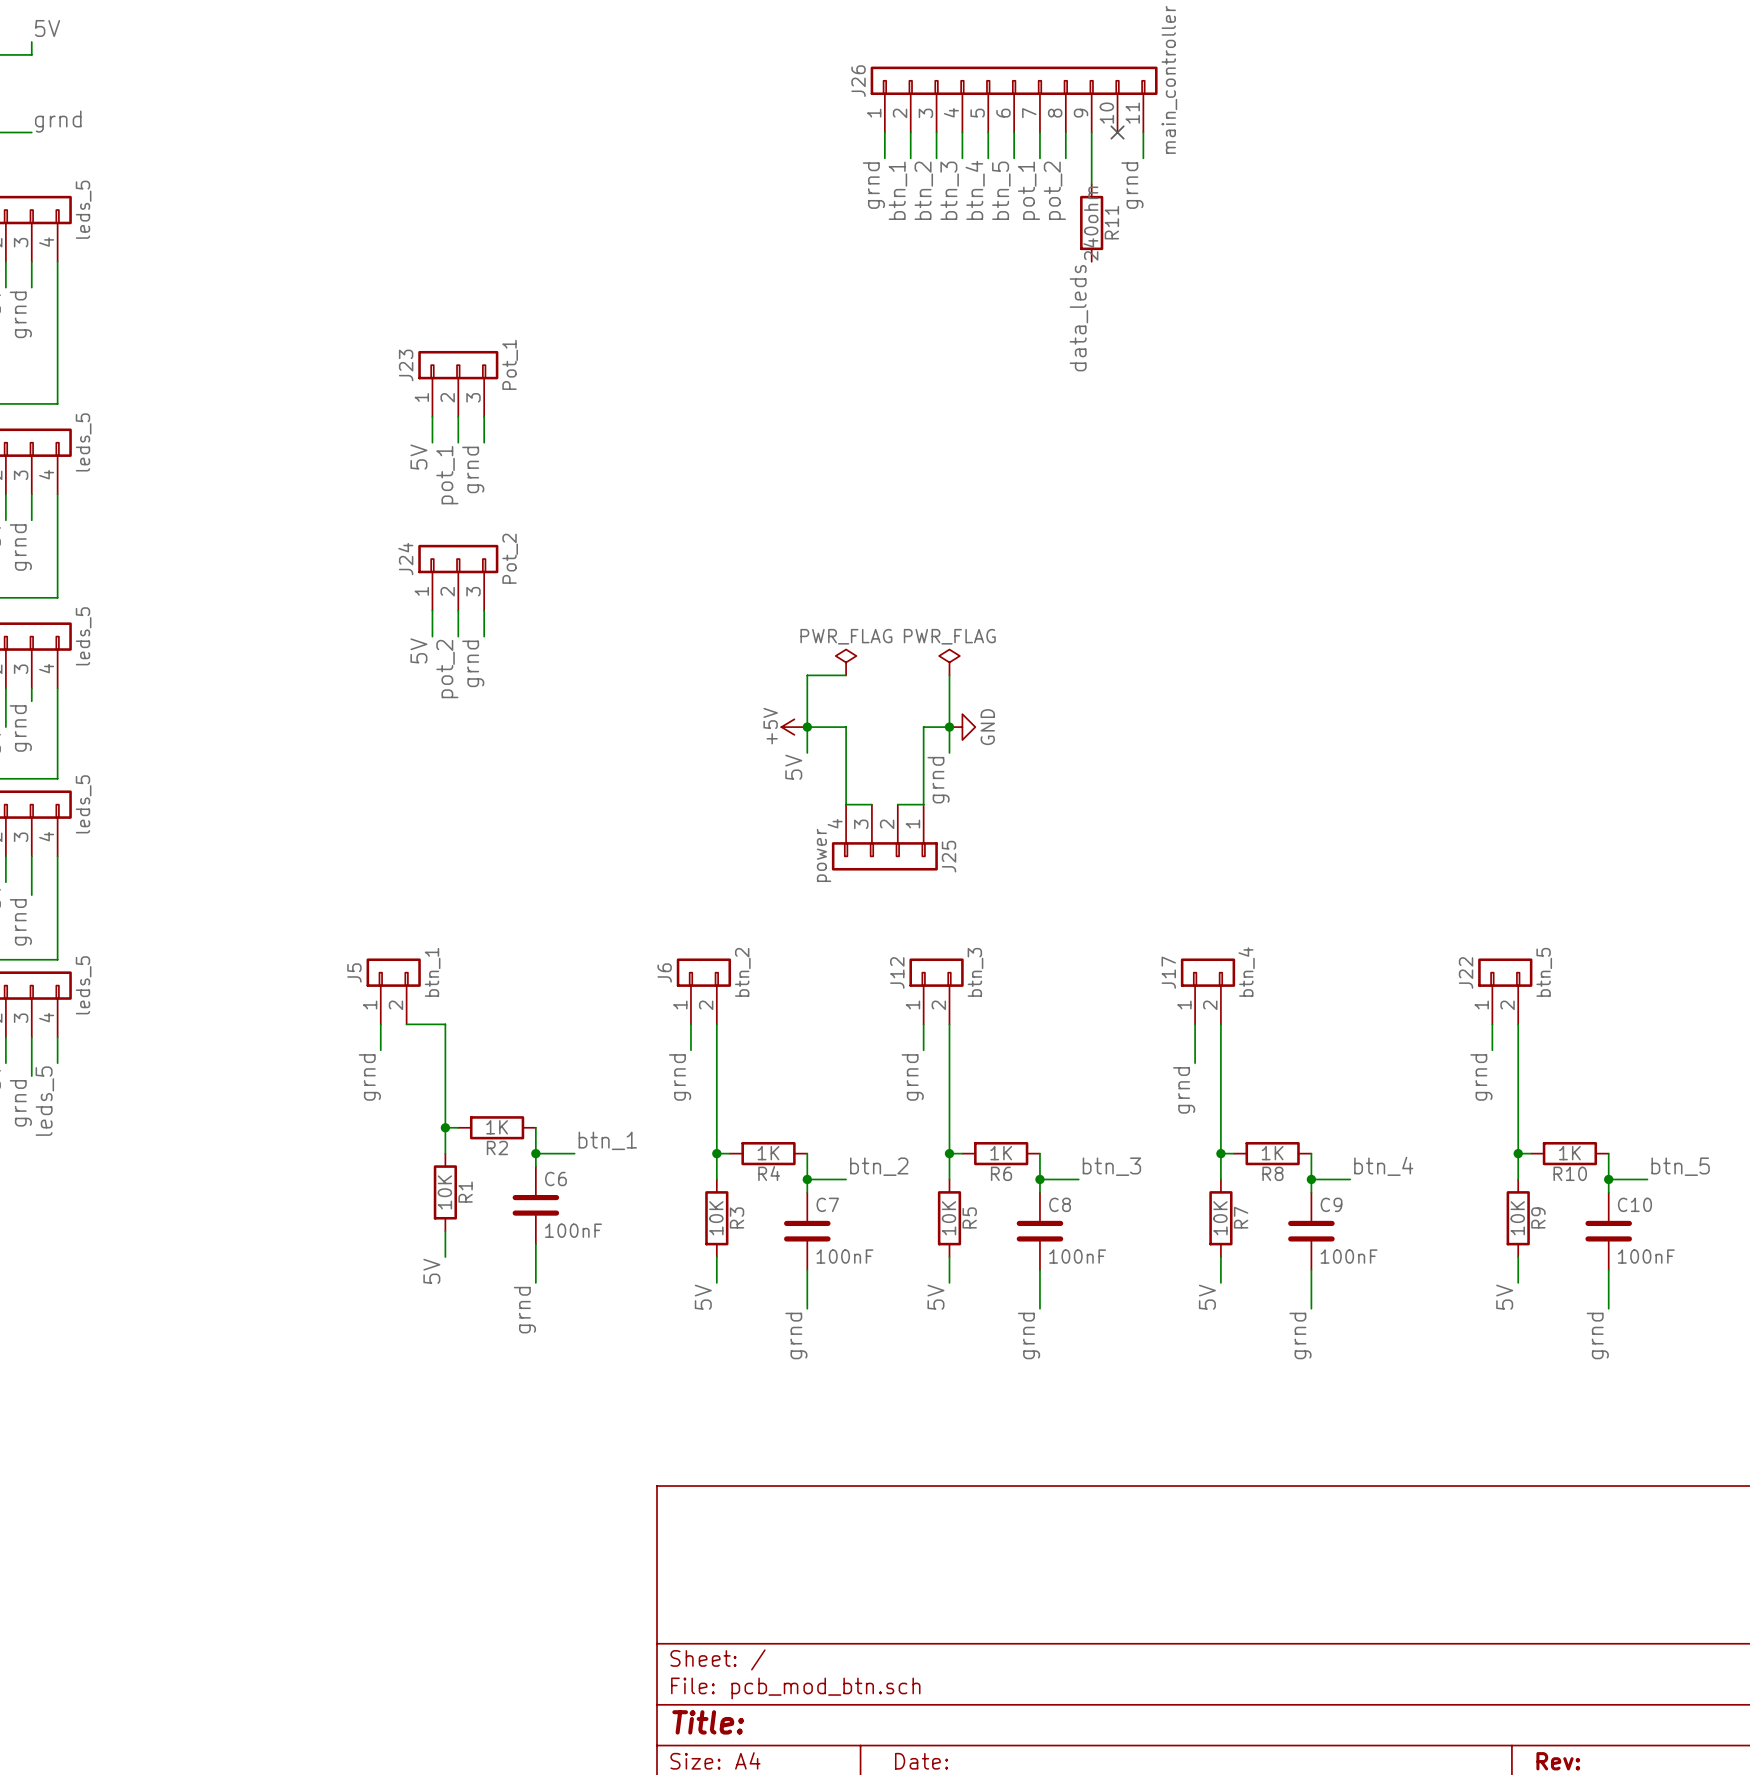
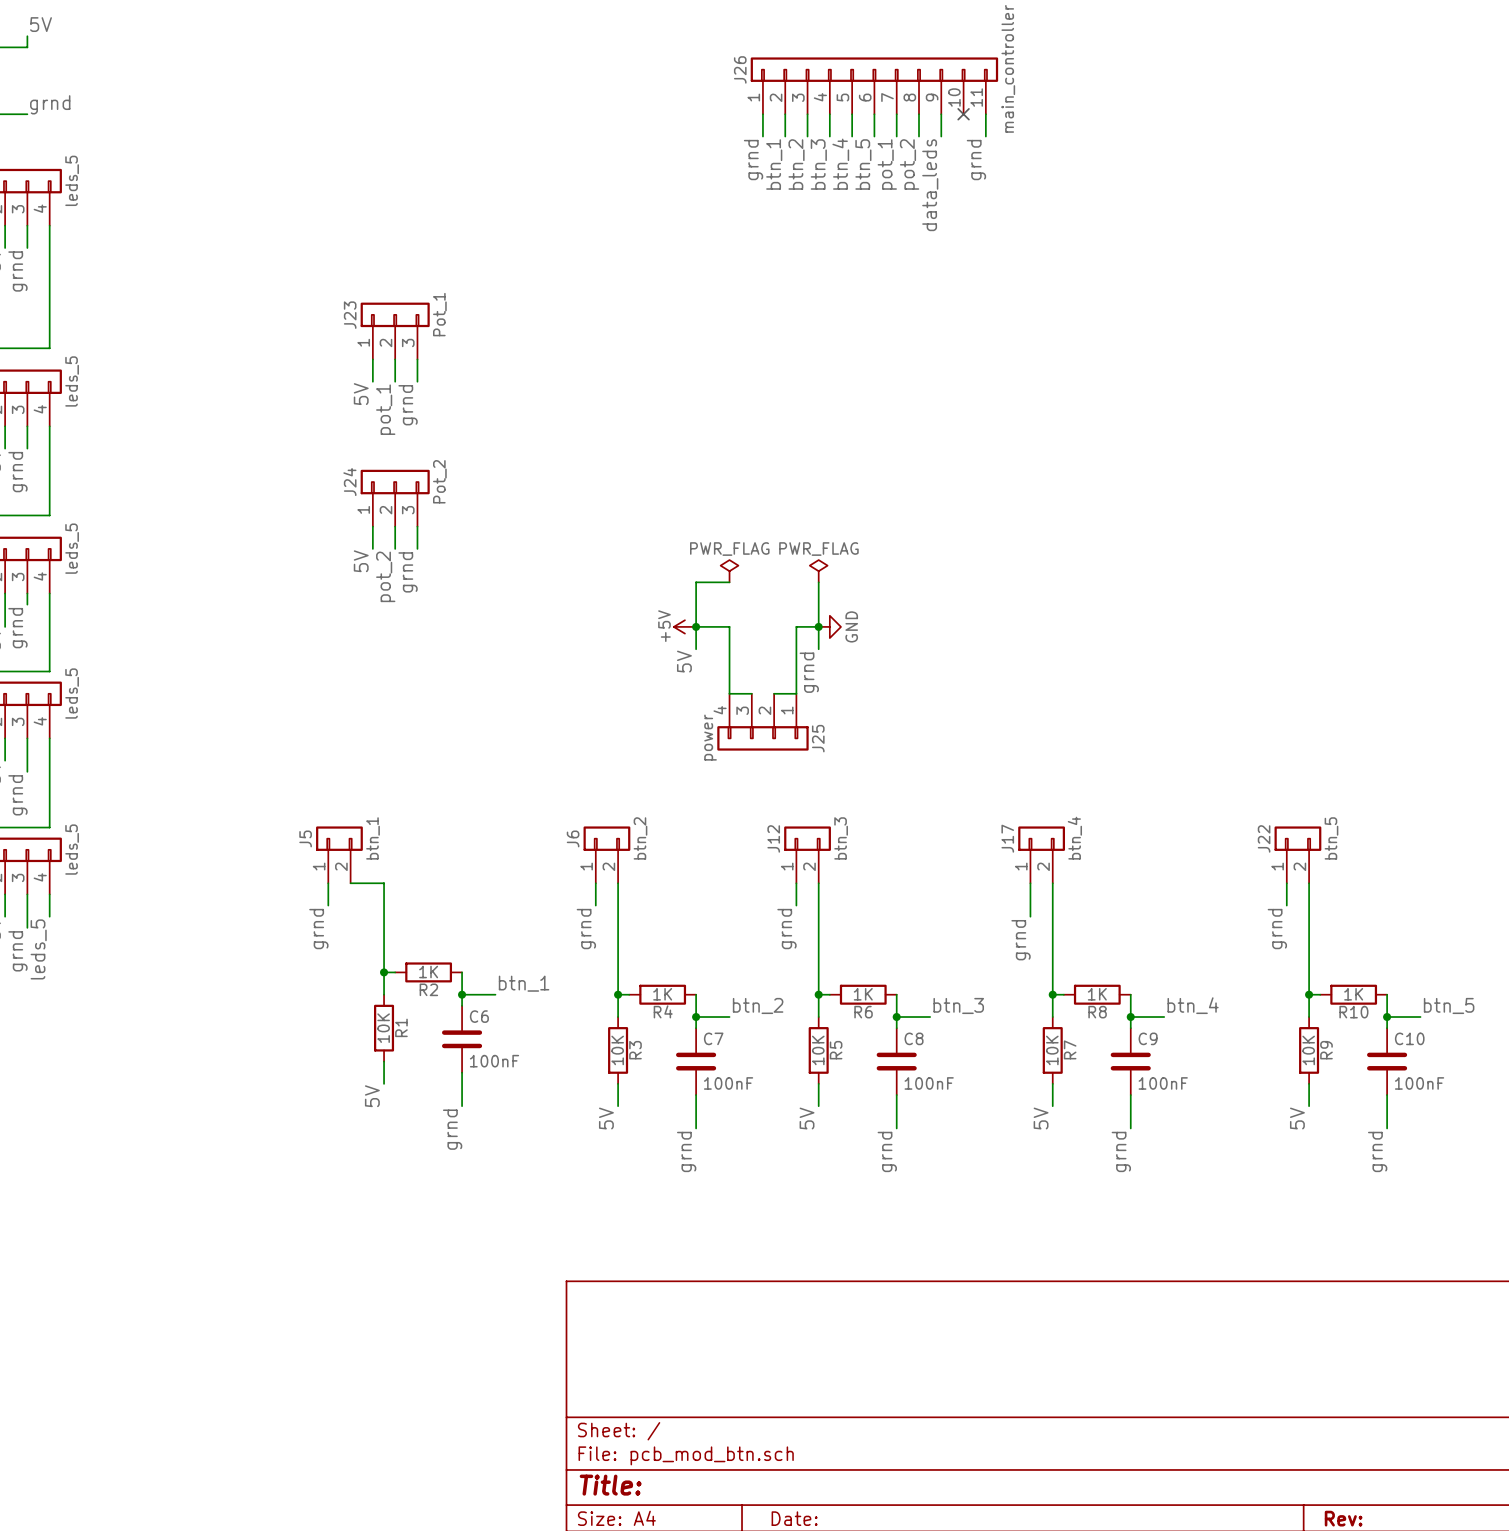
wire: (1091, 158) (1091, 184) -> none
R11: 240ohm (1091, 222) -> none
label position: data_leds (1078, 318) -> data_leds (930, 185)

